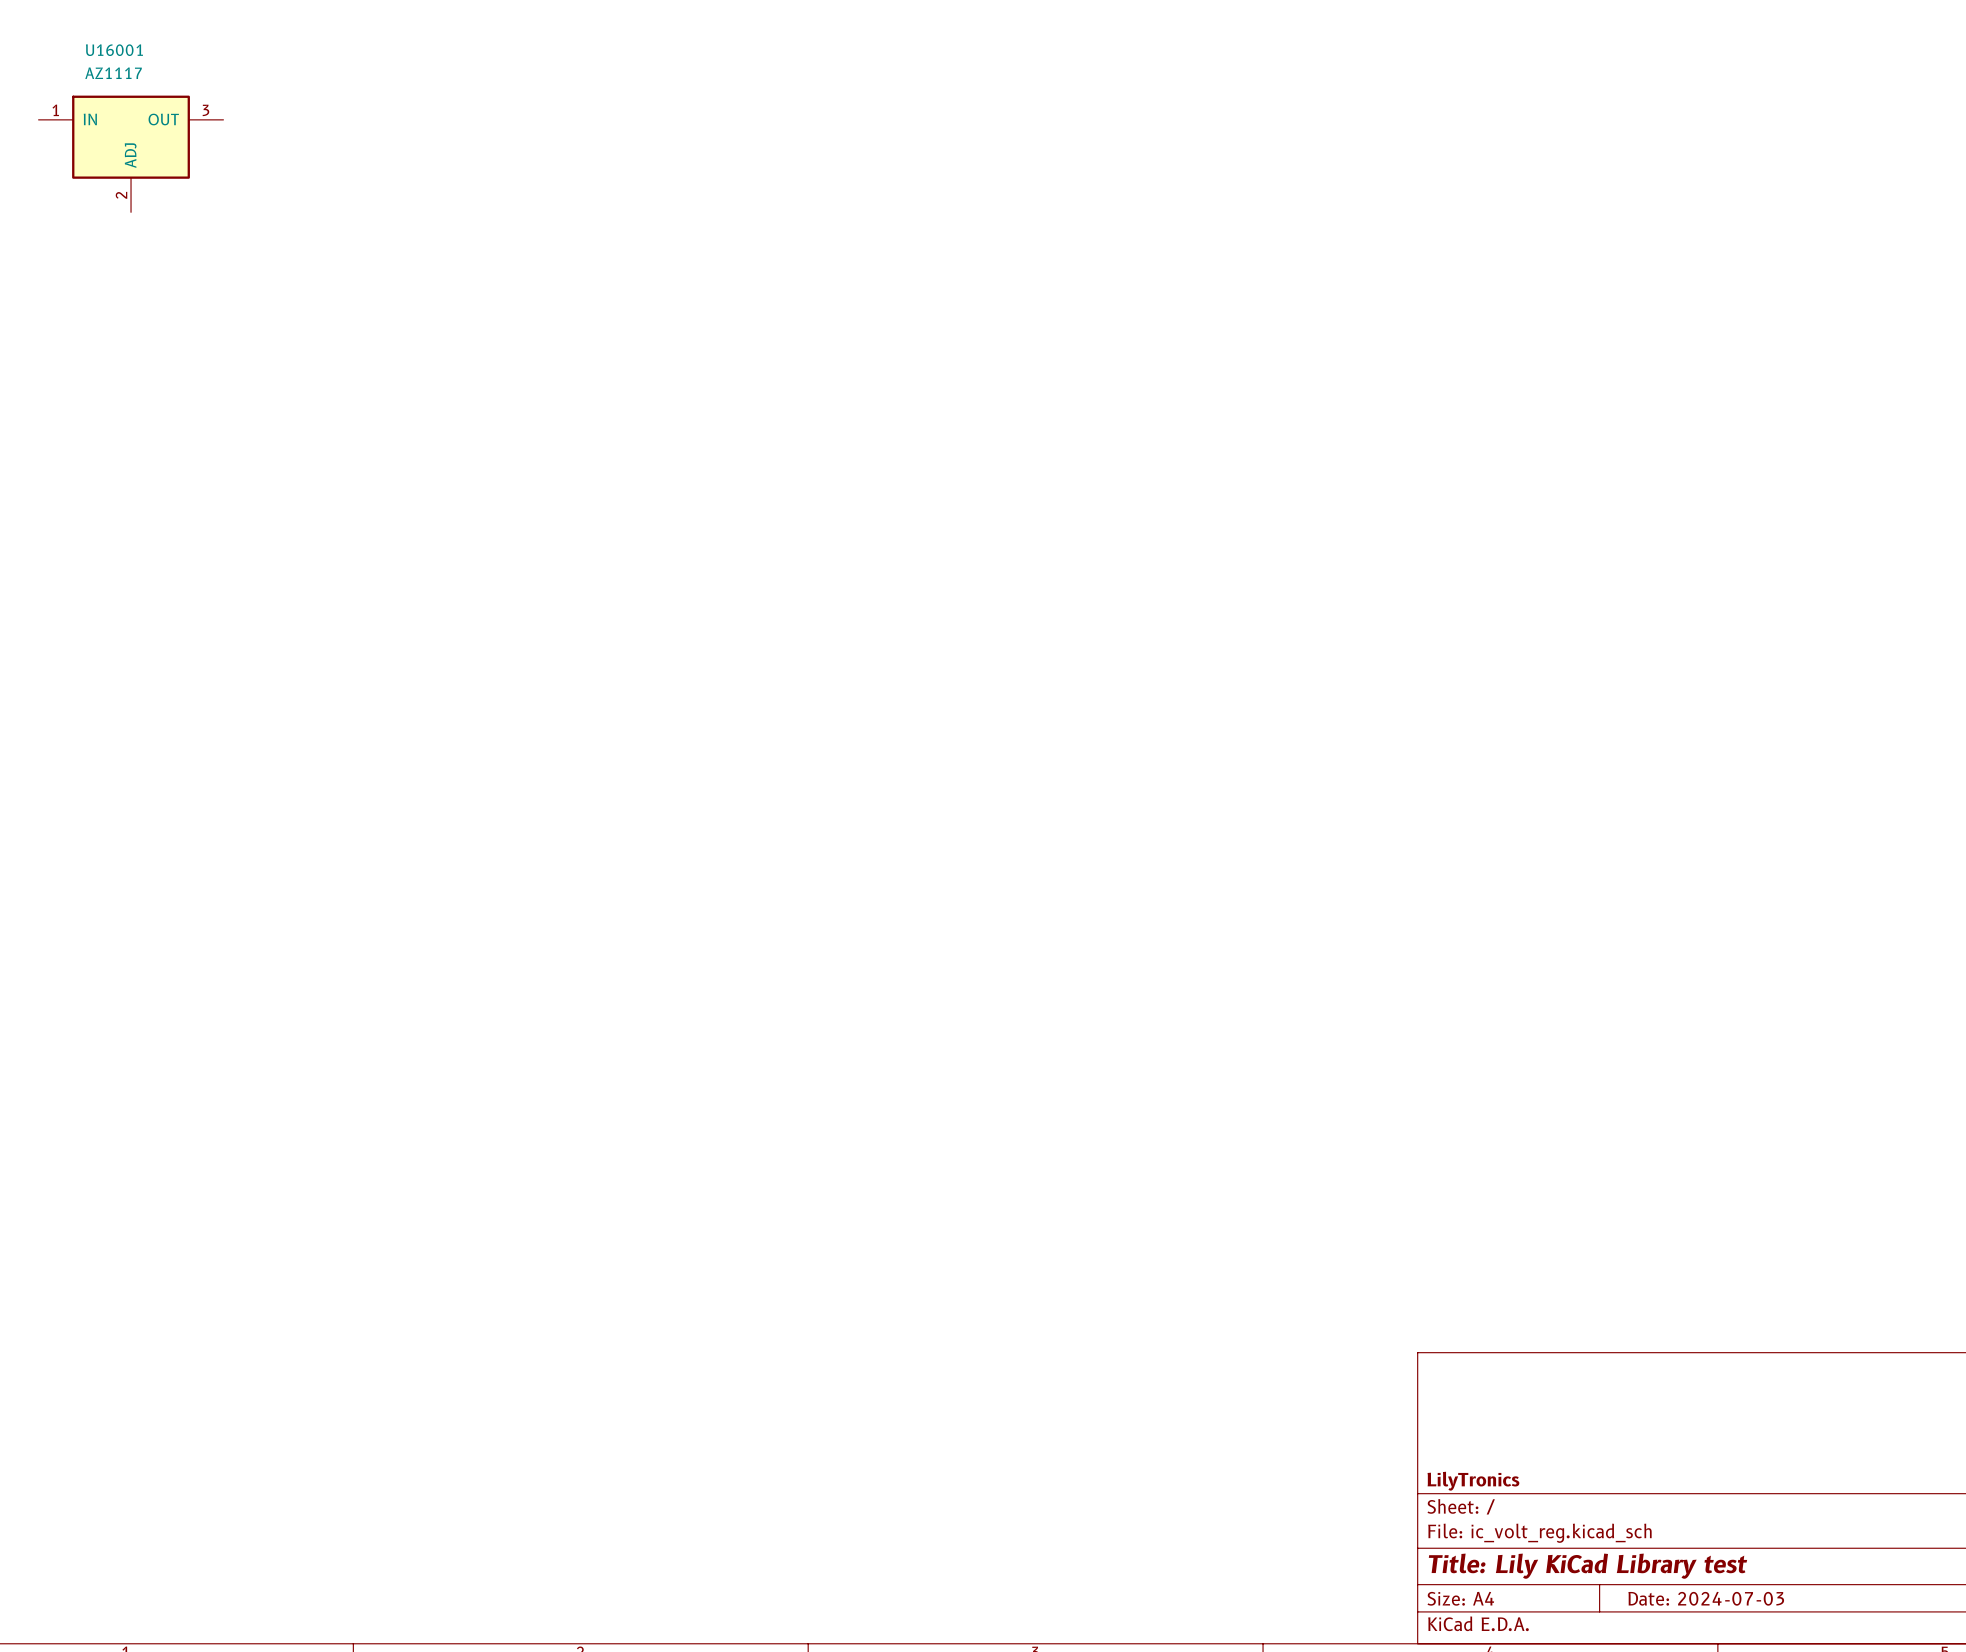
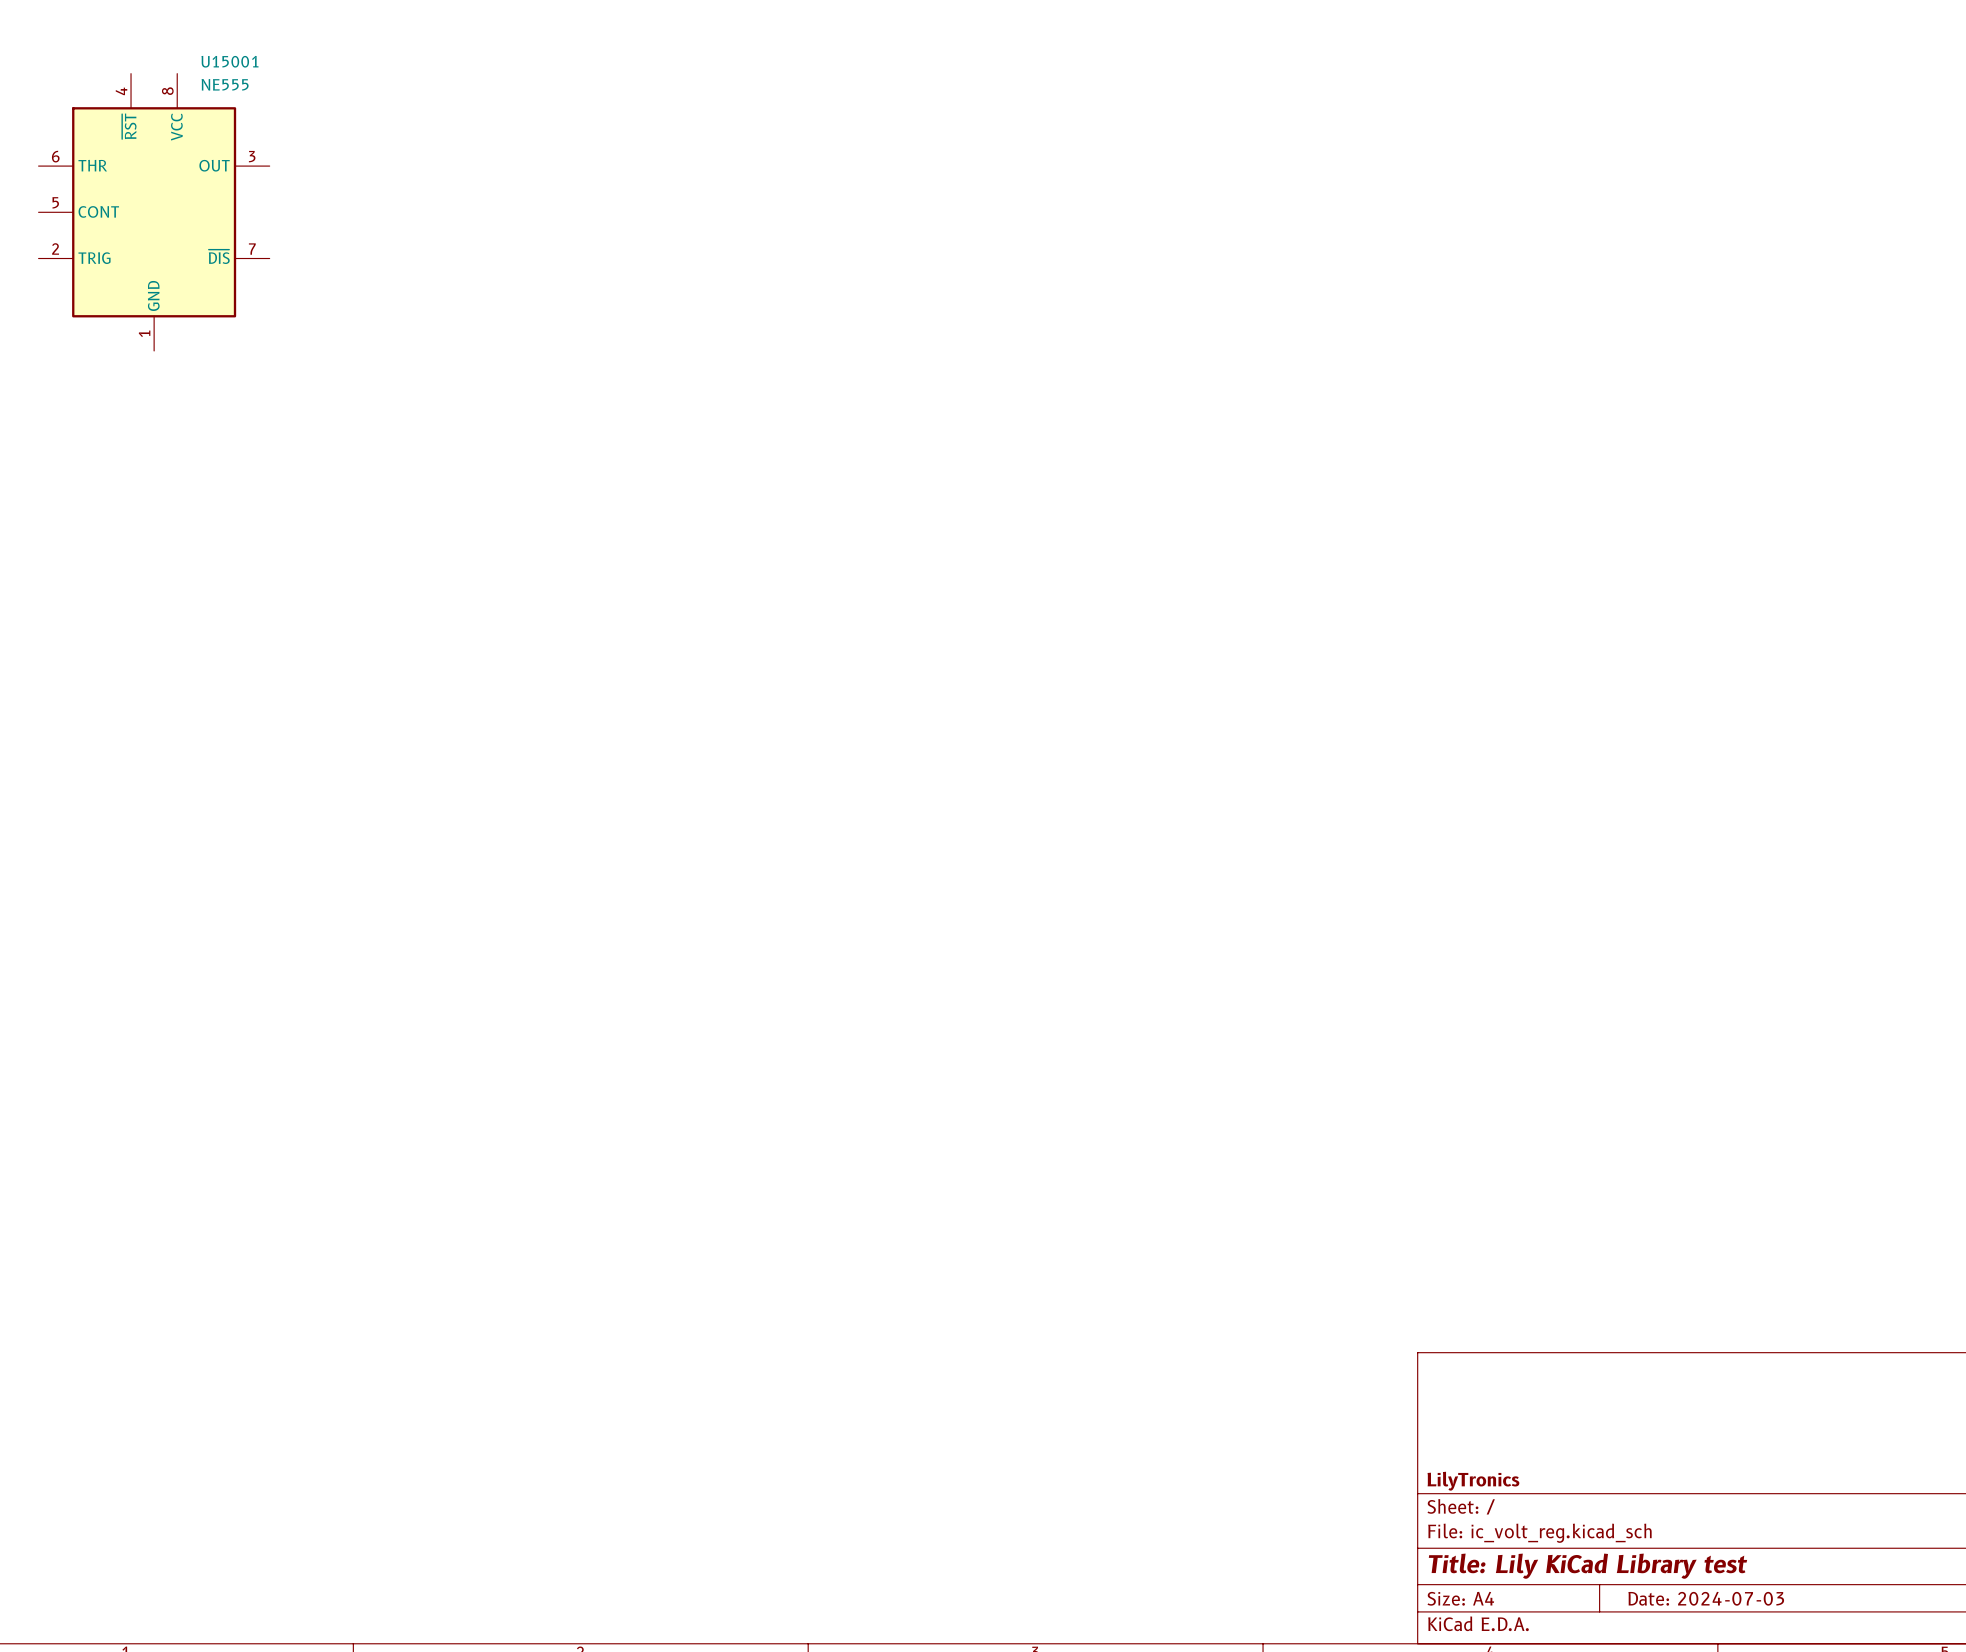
U16001: AZ1117 (131, 153) -> none
U15001: none -> NE555 (154, 212)

